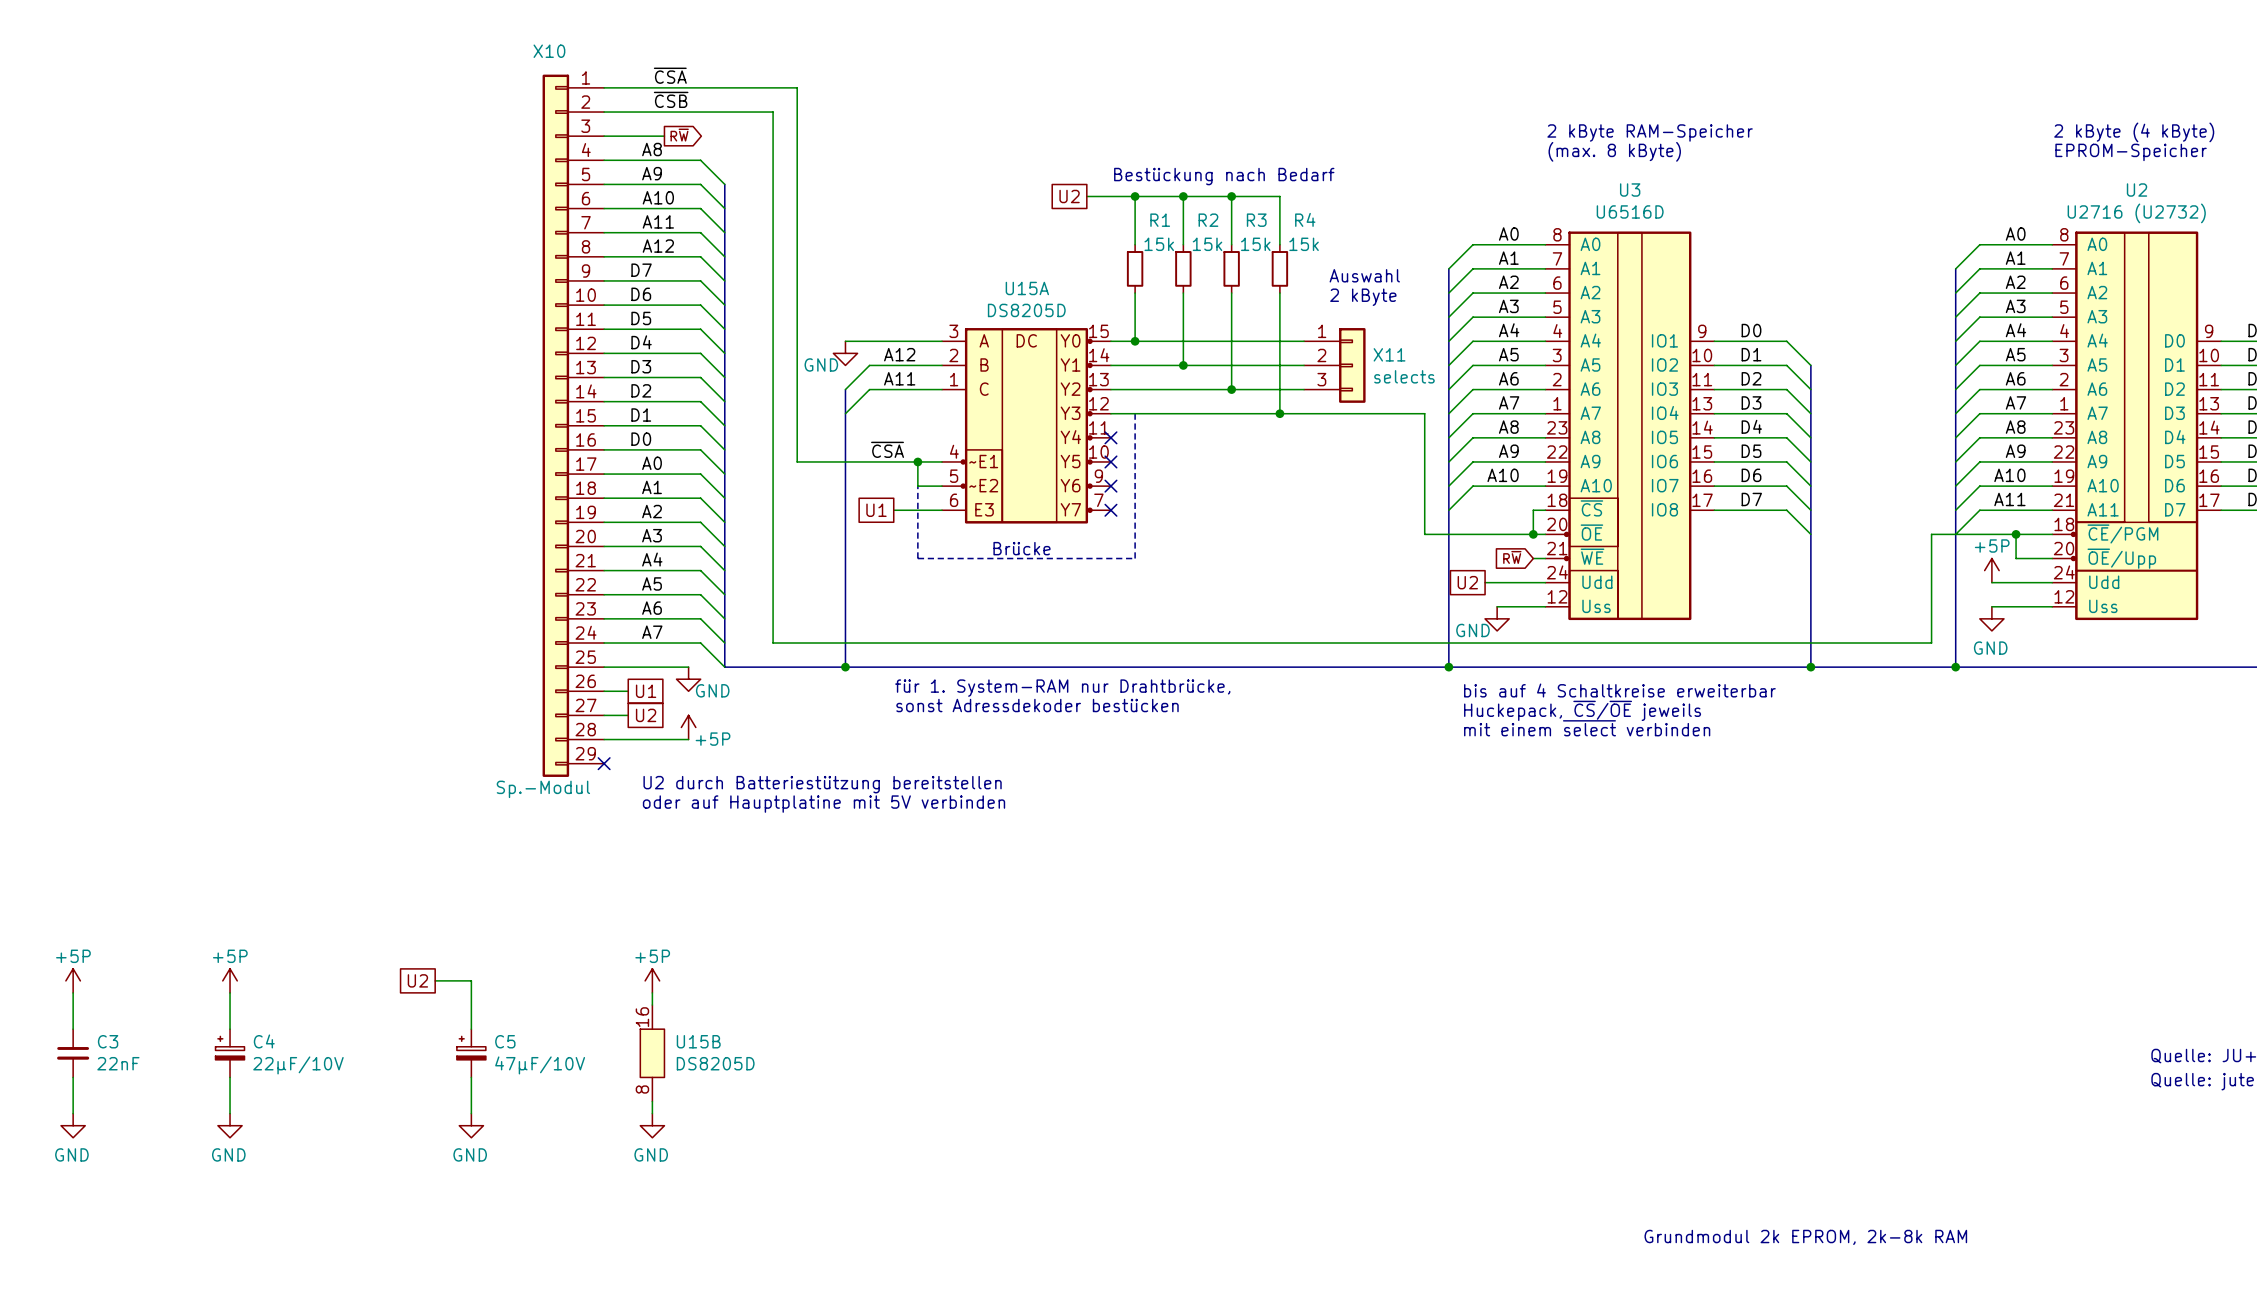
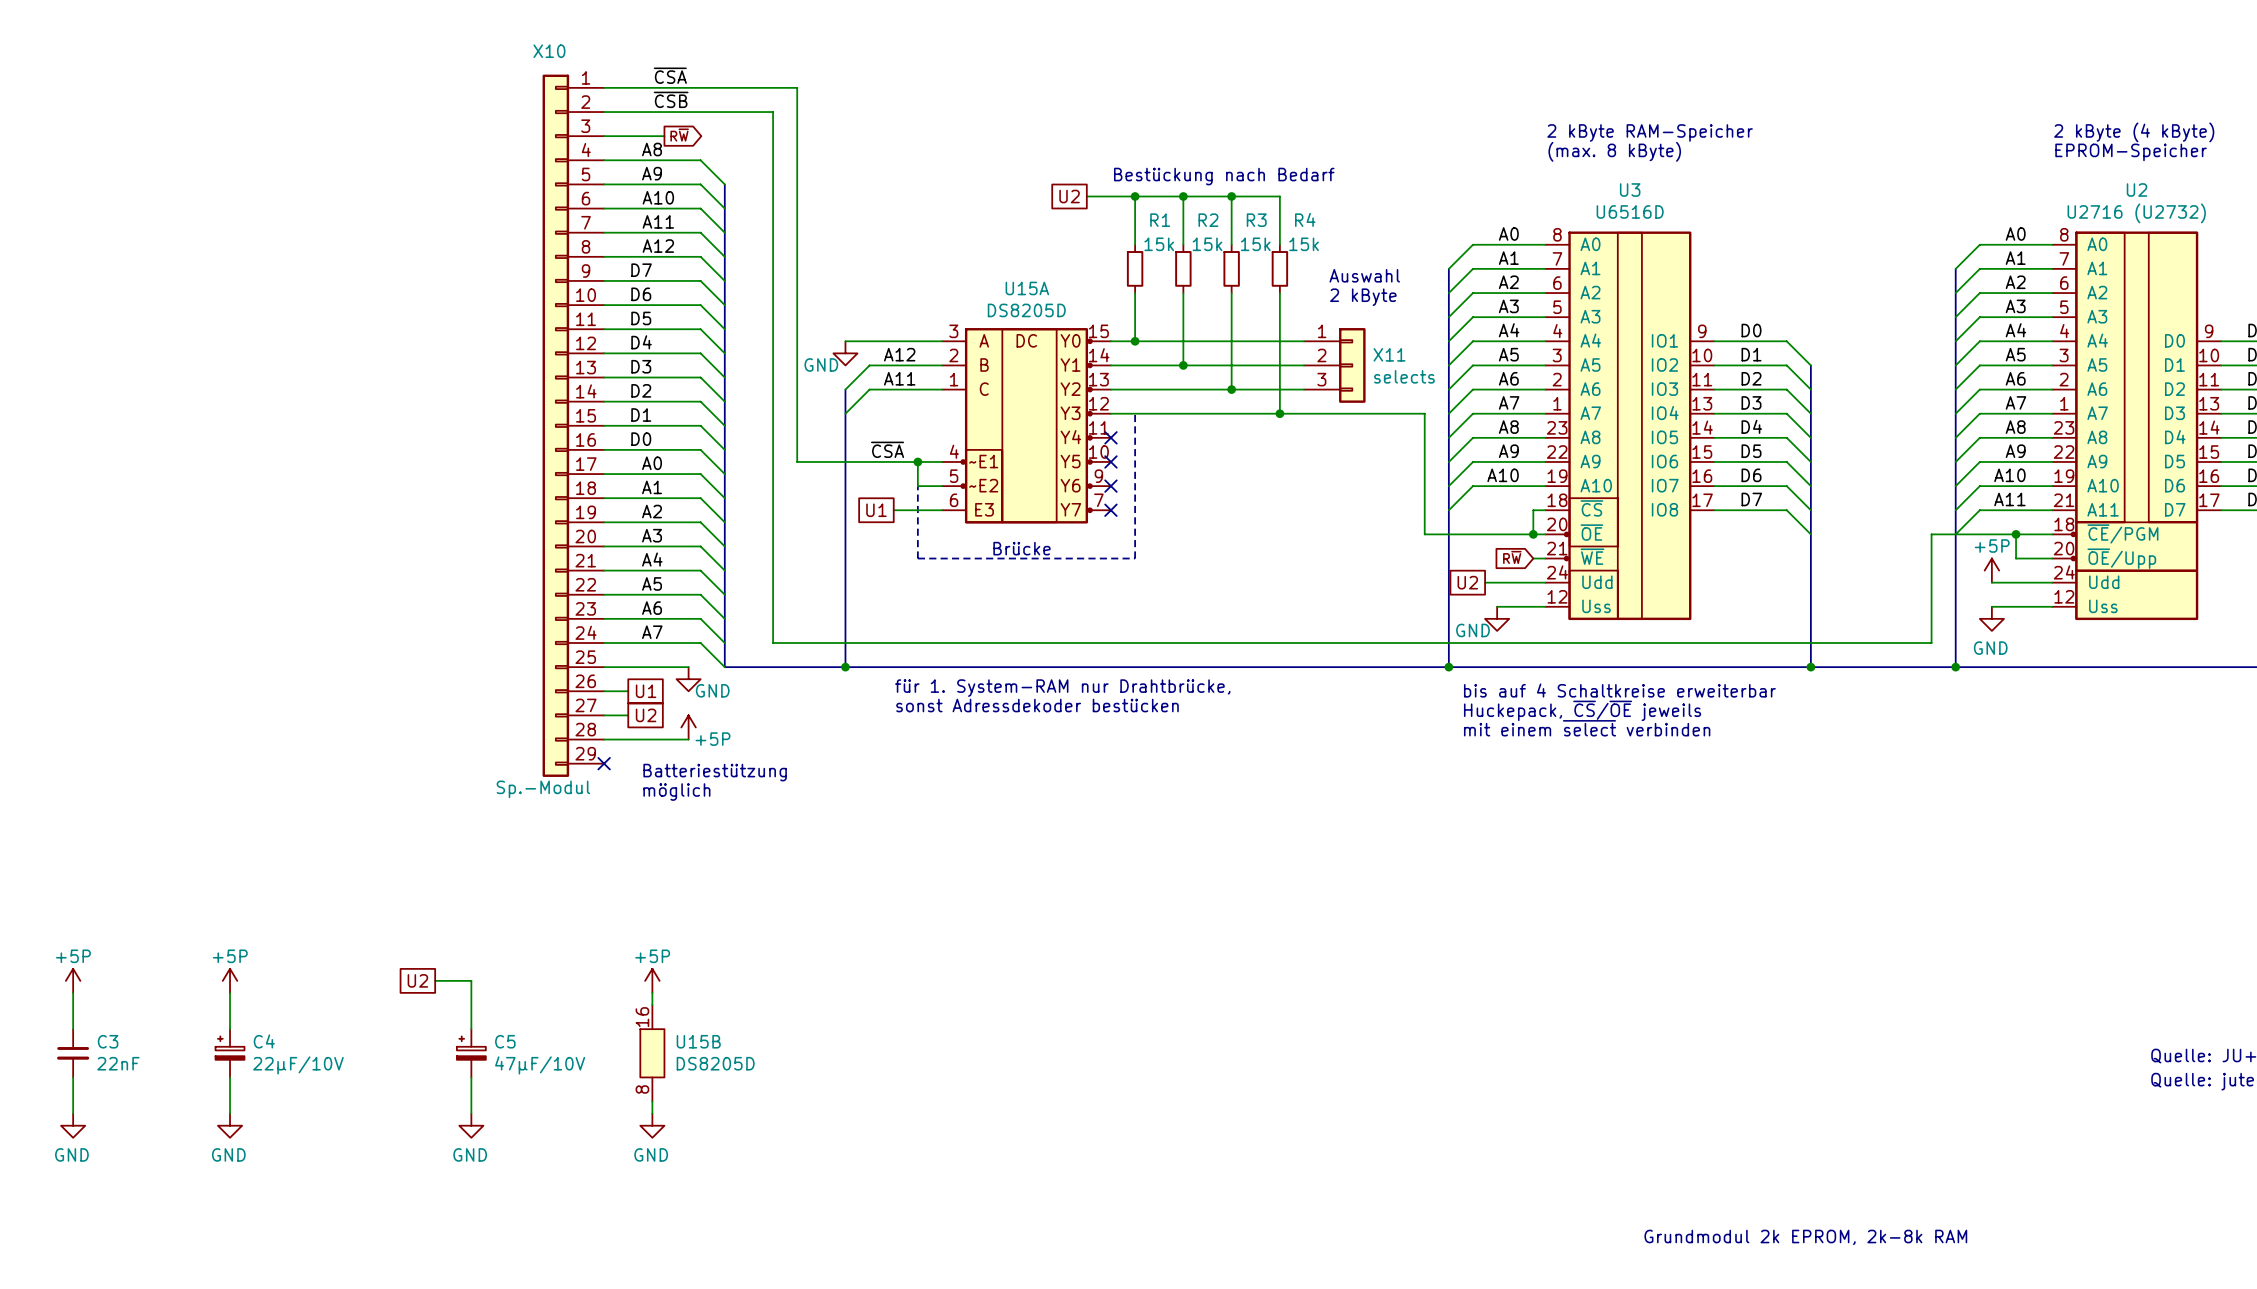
text: none -> Batteriestützung (715, 772)
text: U2 durch Batteriestützung bereitstellen (822, 784) -> none
text: none -> möglich (676, 792)
text: oder auf Hauptplatine mit 5V verbinden (824, 804) -> none

